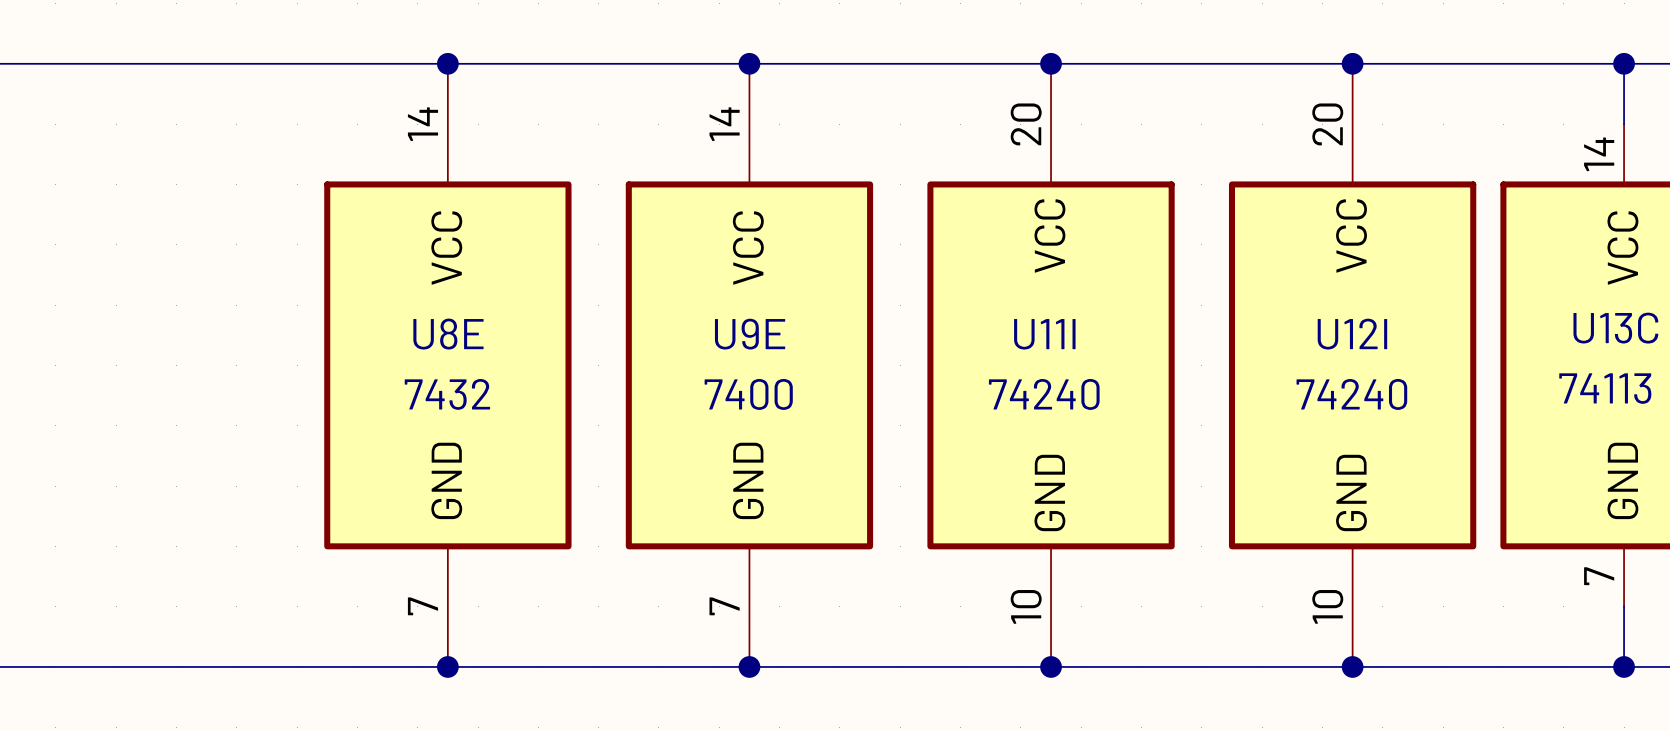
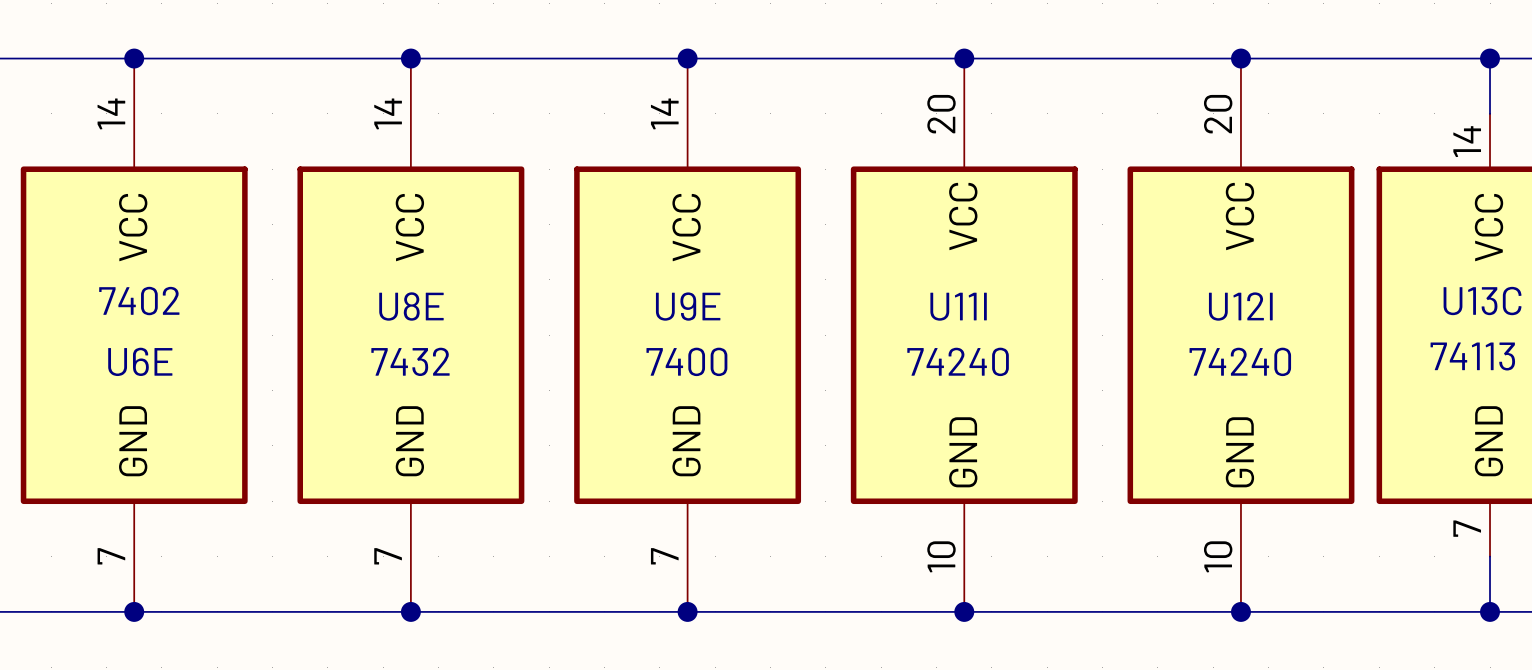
junction: none -> (134, 58)
U6E: none -> 7402 (134, 335)
junction: none -> (134, 611)

